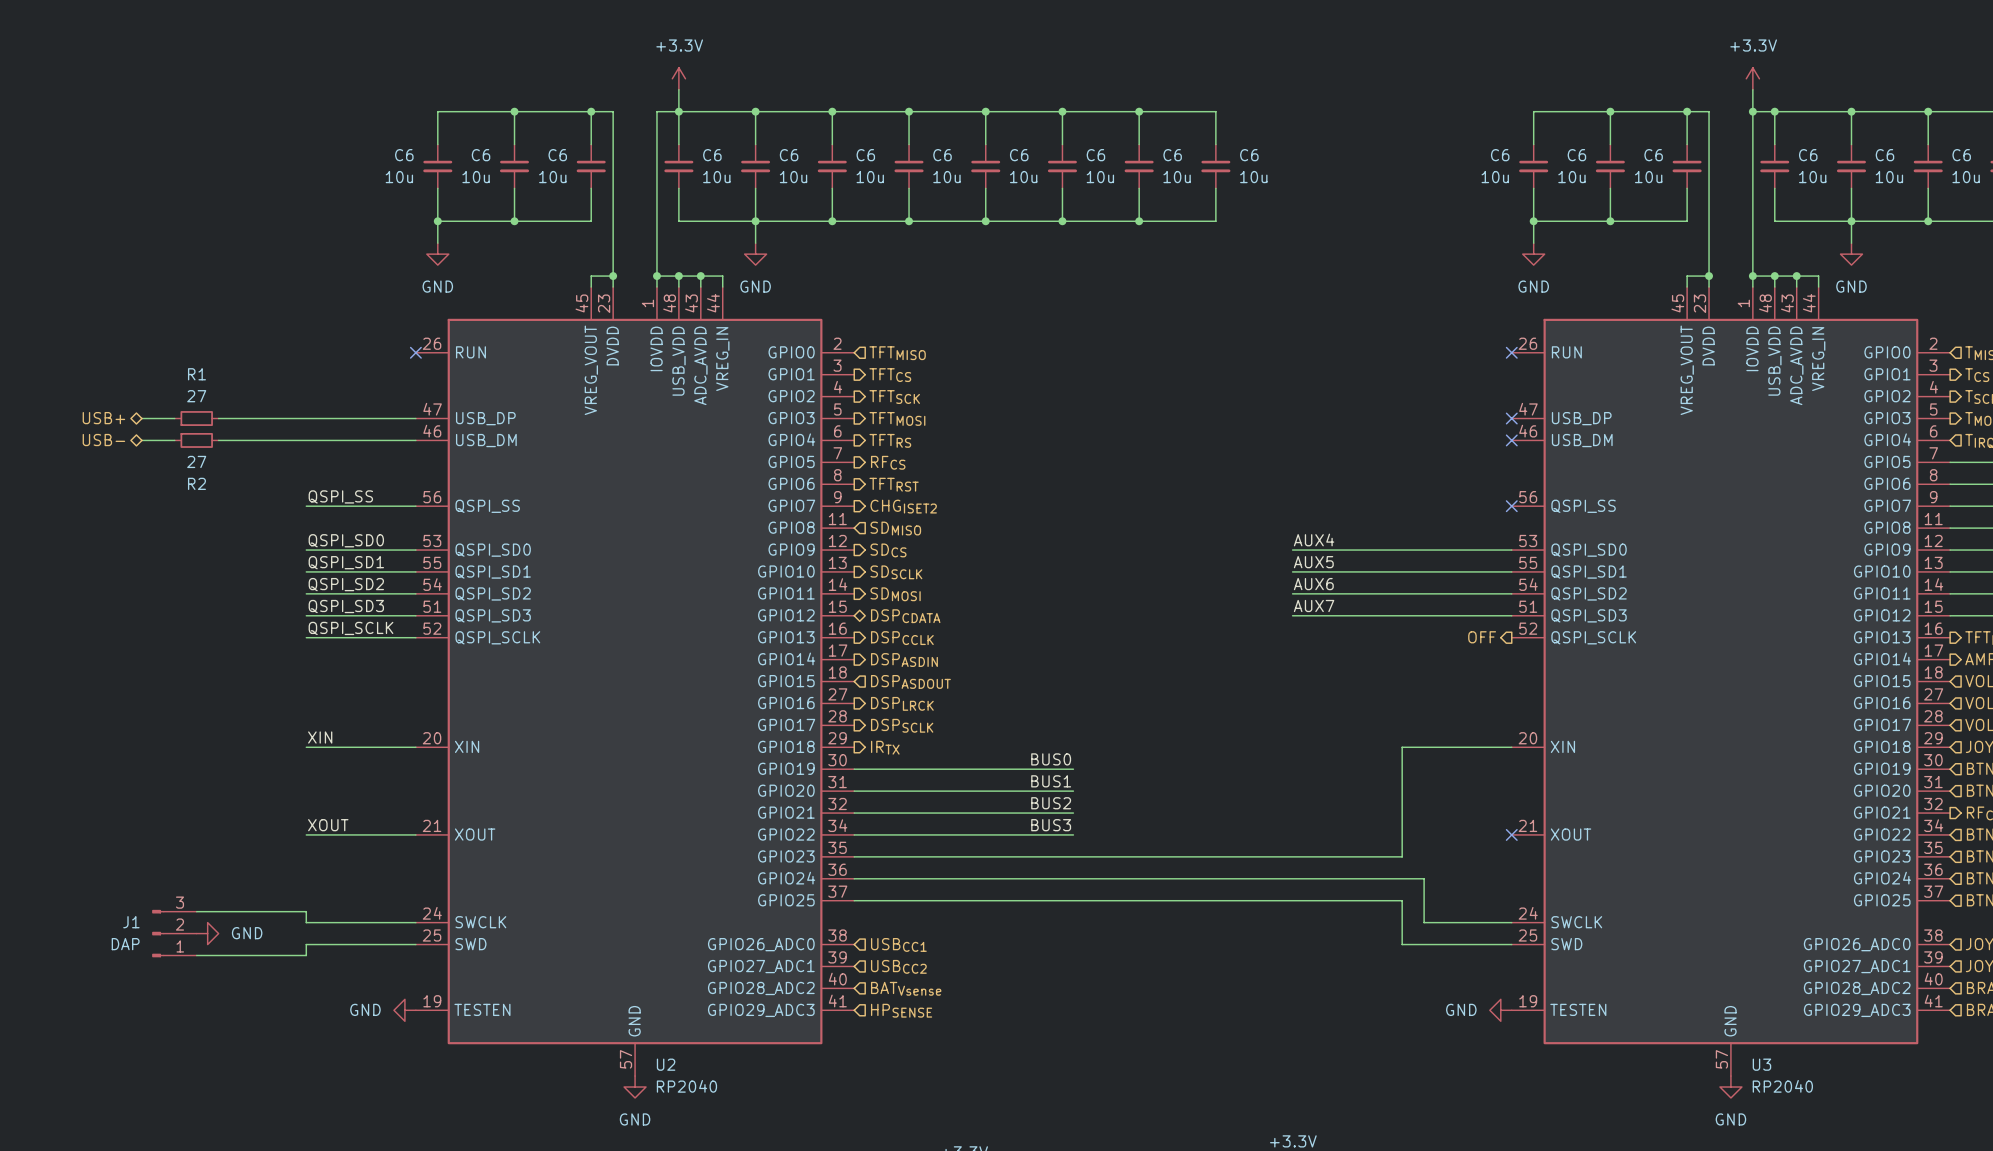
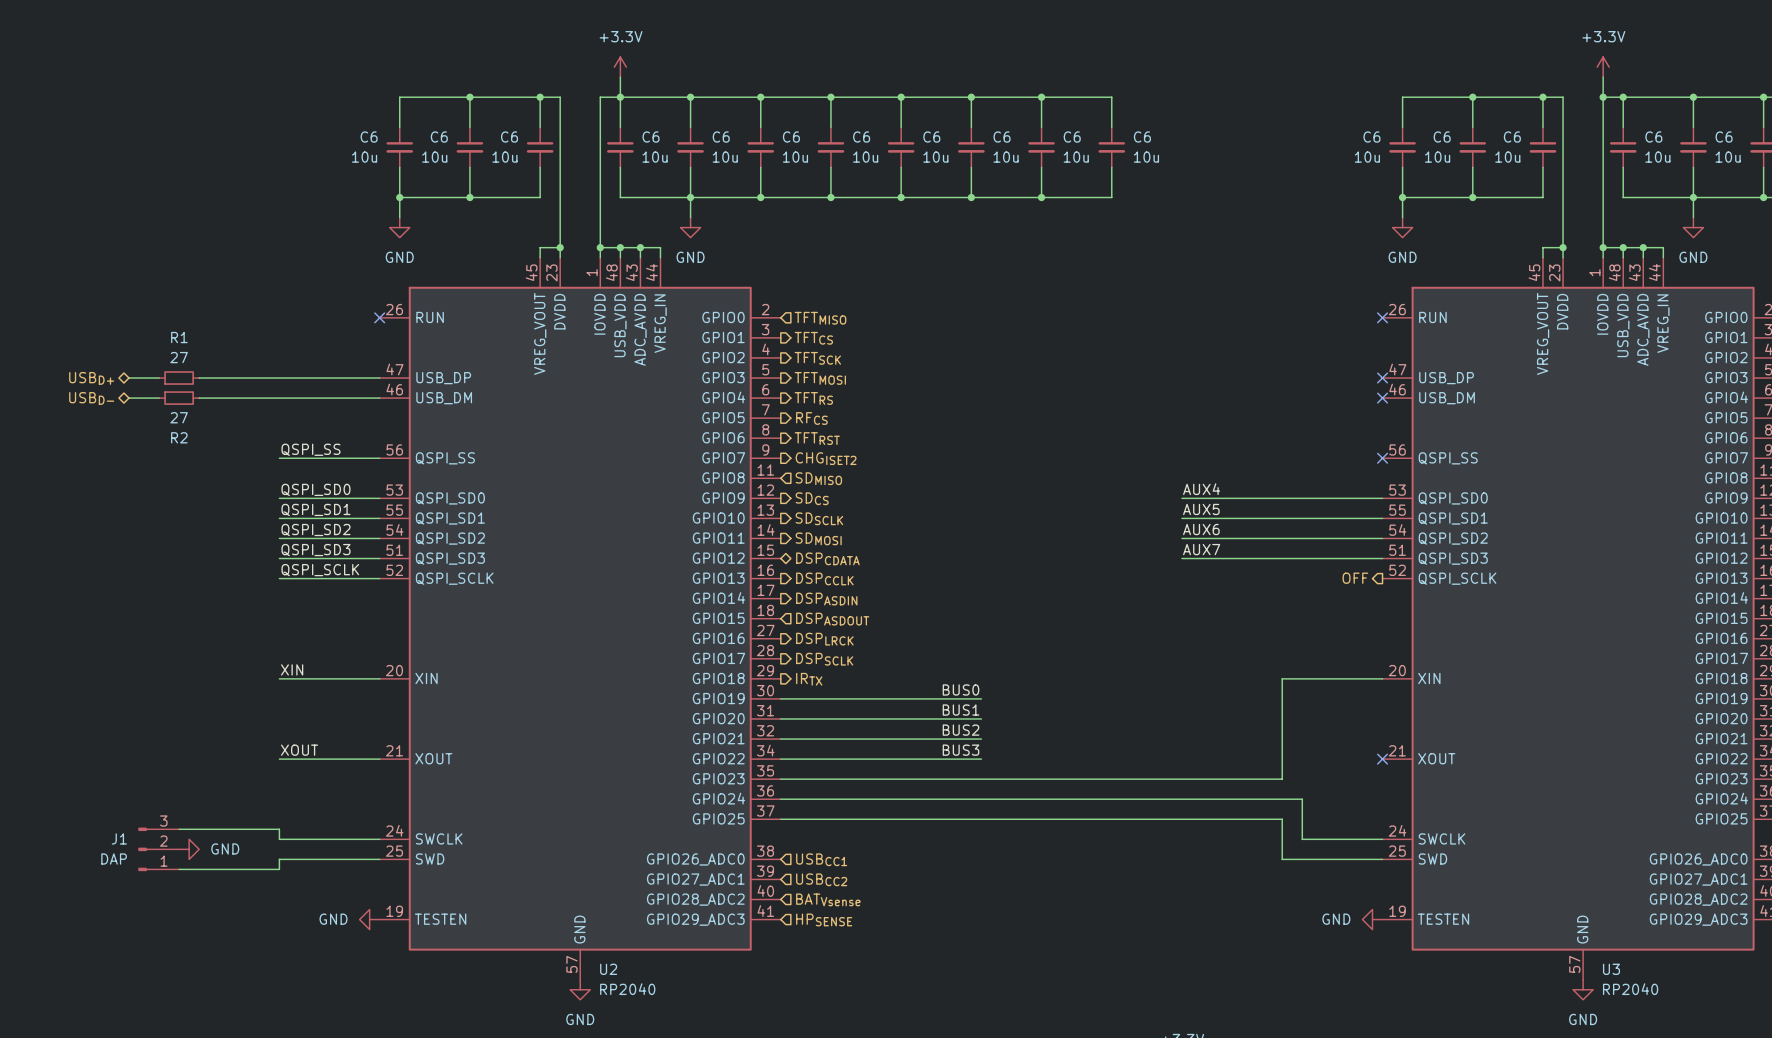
hierarchical label: USB+ (103, 418) -> USBD+ (91, 378)
hierarchical label: USB- (103, 440) -> USBD- (91, 398)

